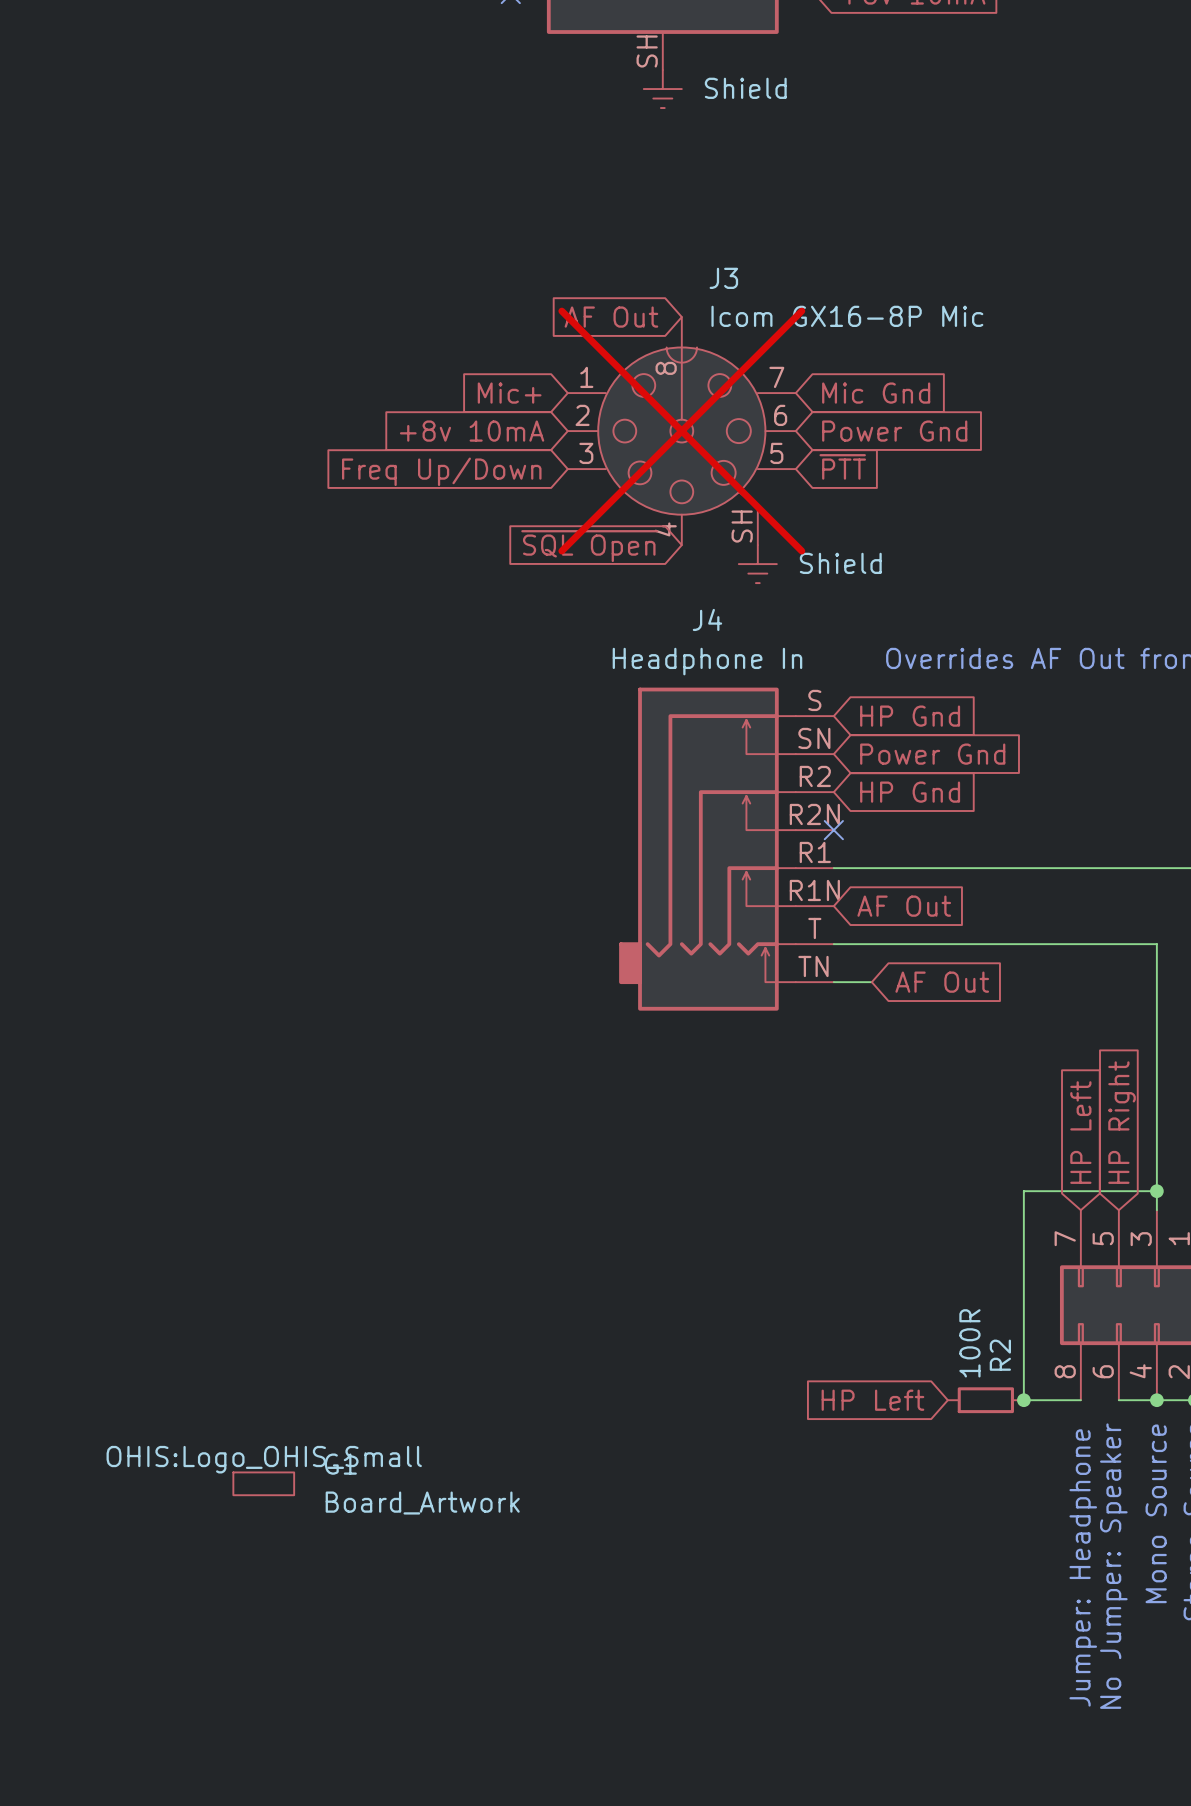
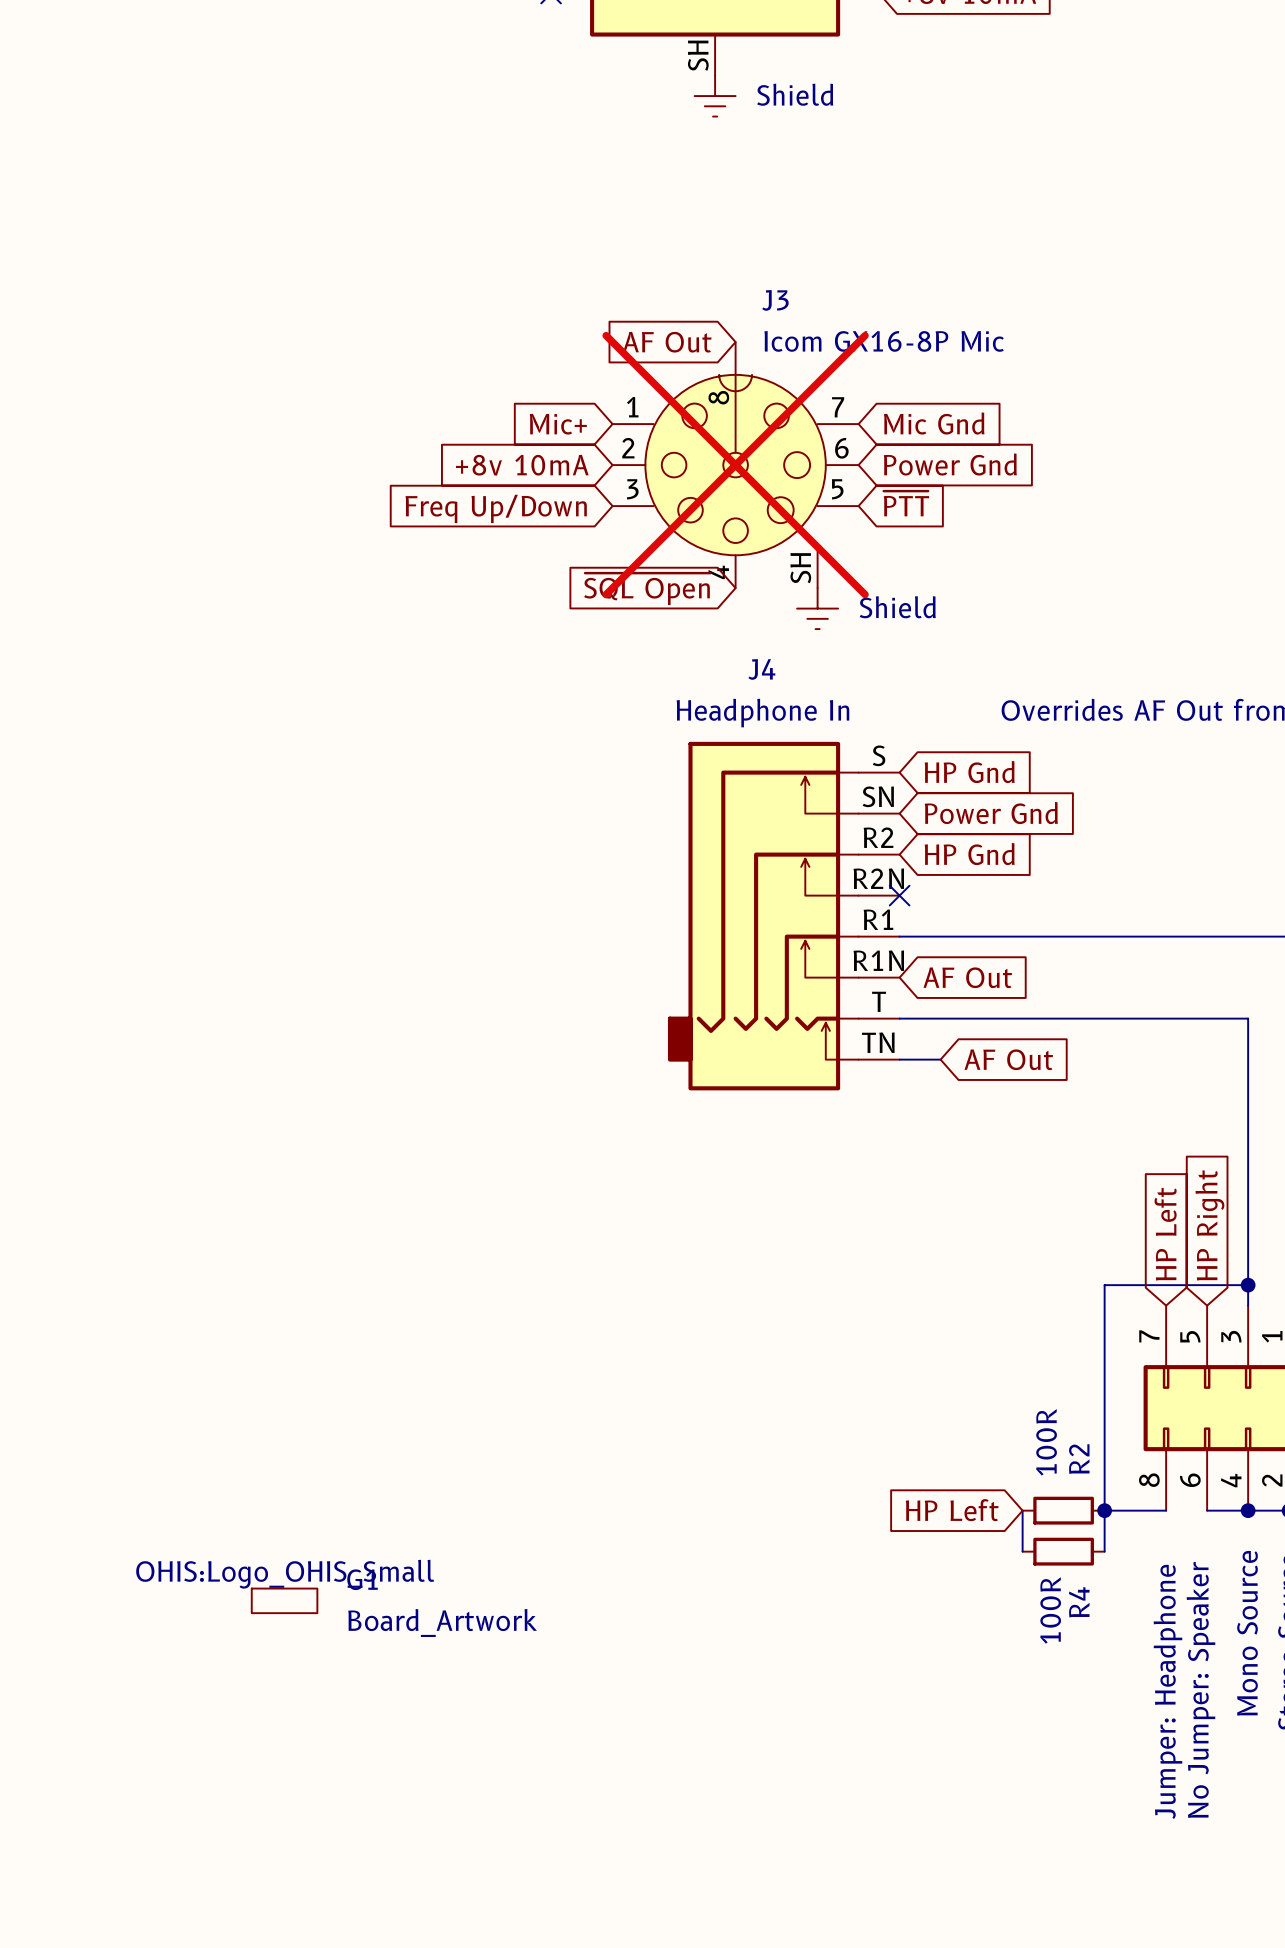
wire: none -> (1022, 1510) (1022, 1551)
wire: none -> (1104, 1510) (1104, 1551)
R4: none -> 100R (1063, 1551)

